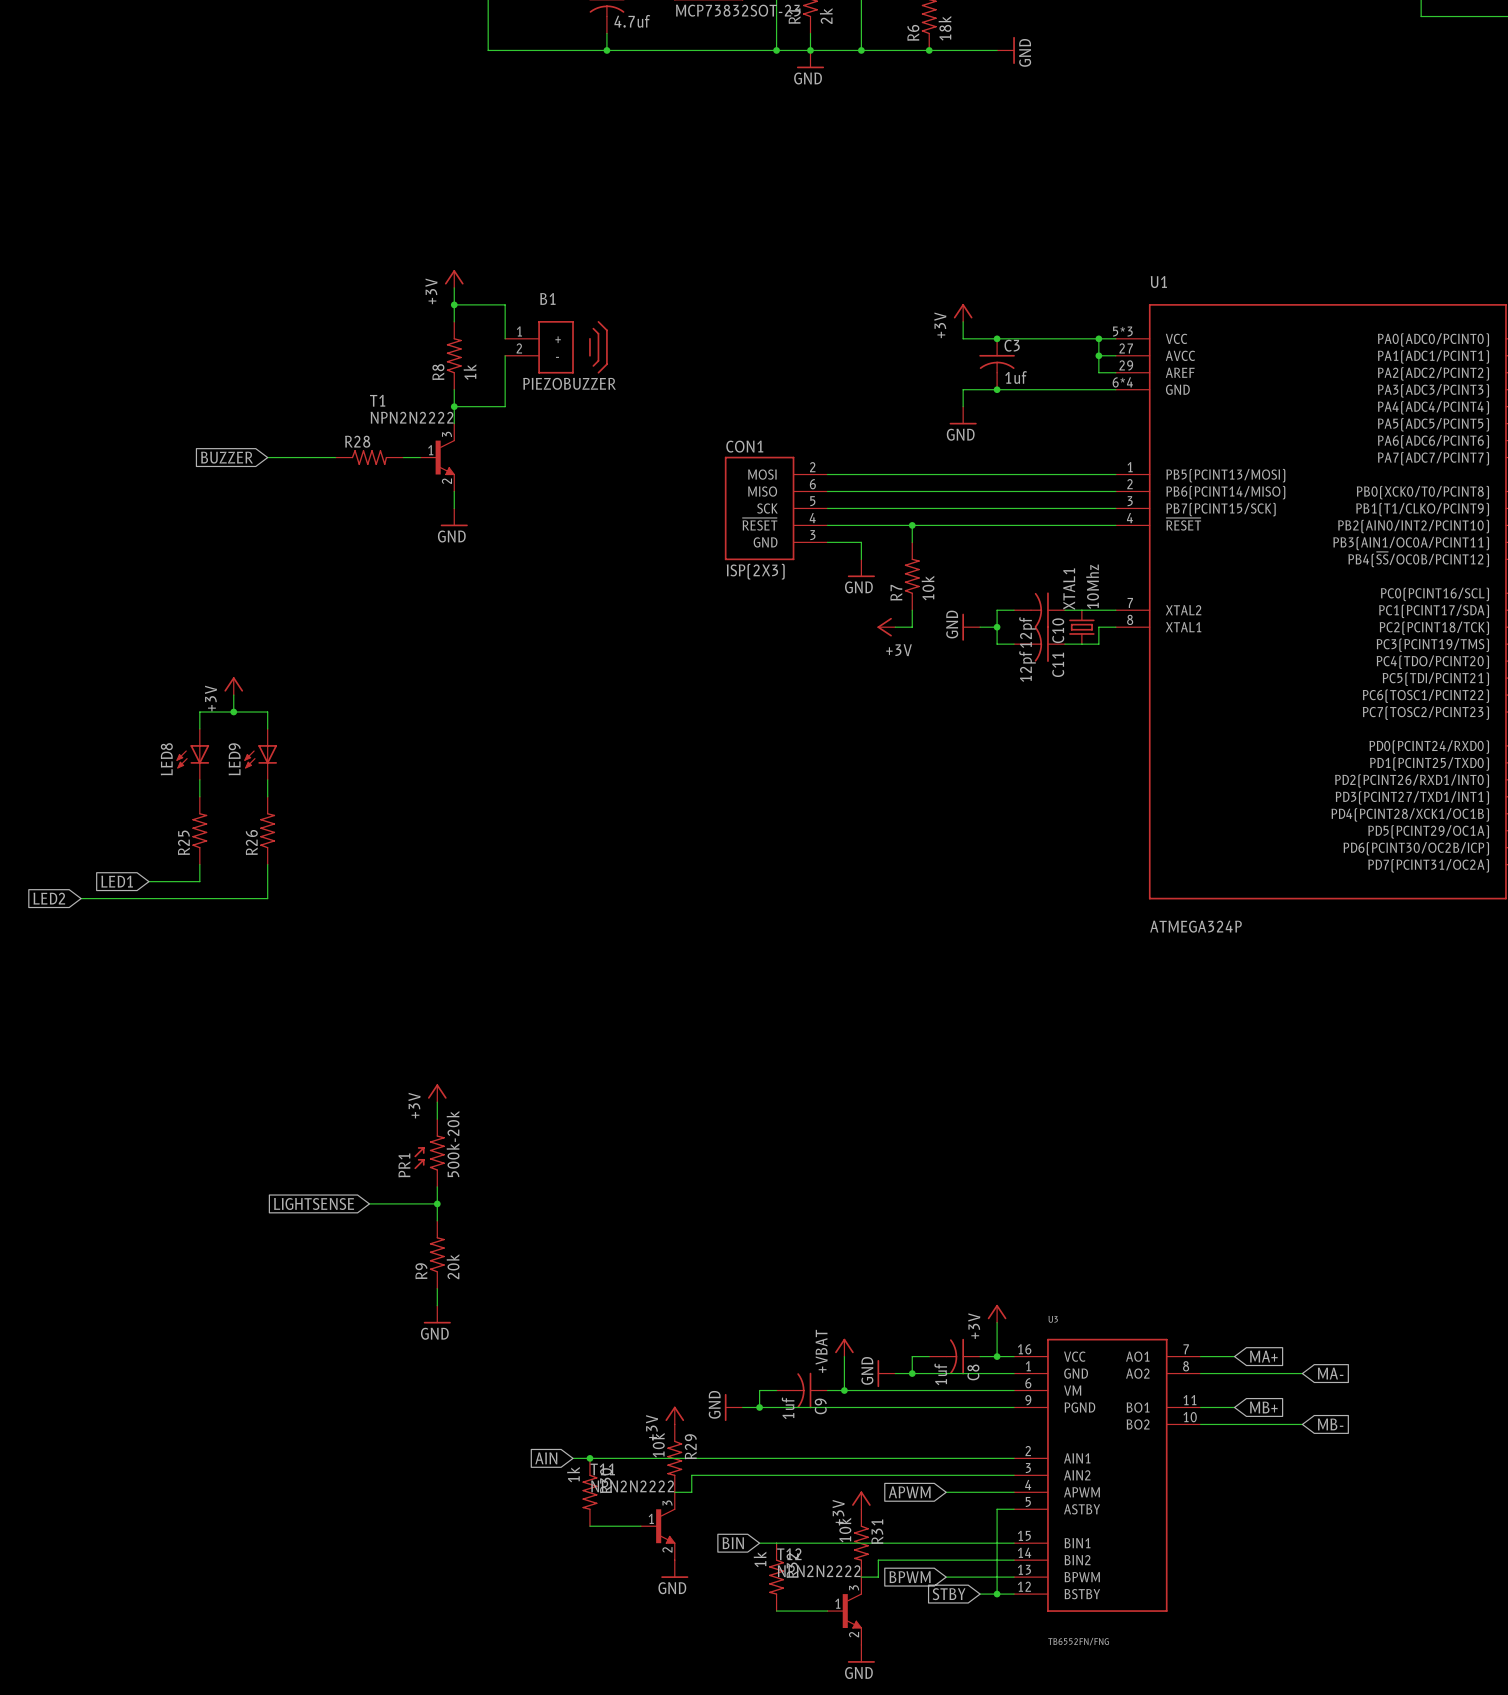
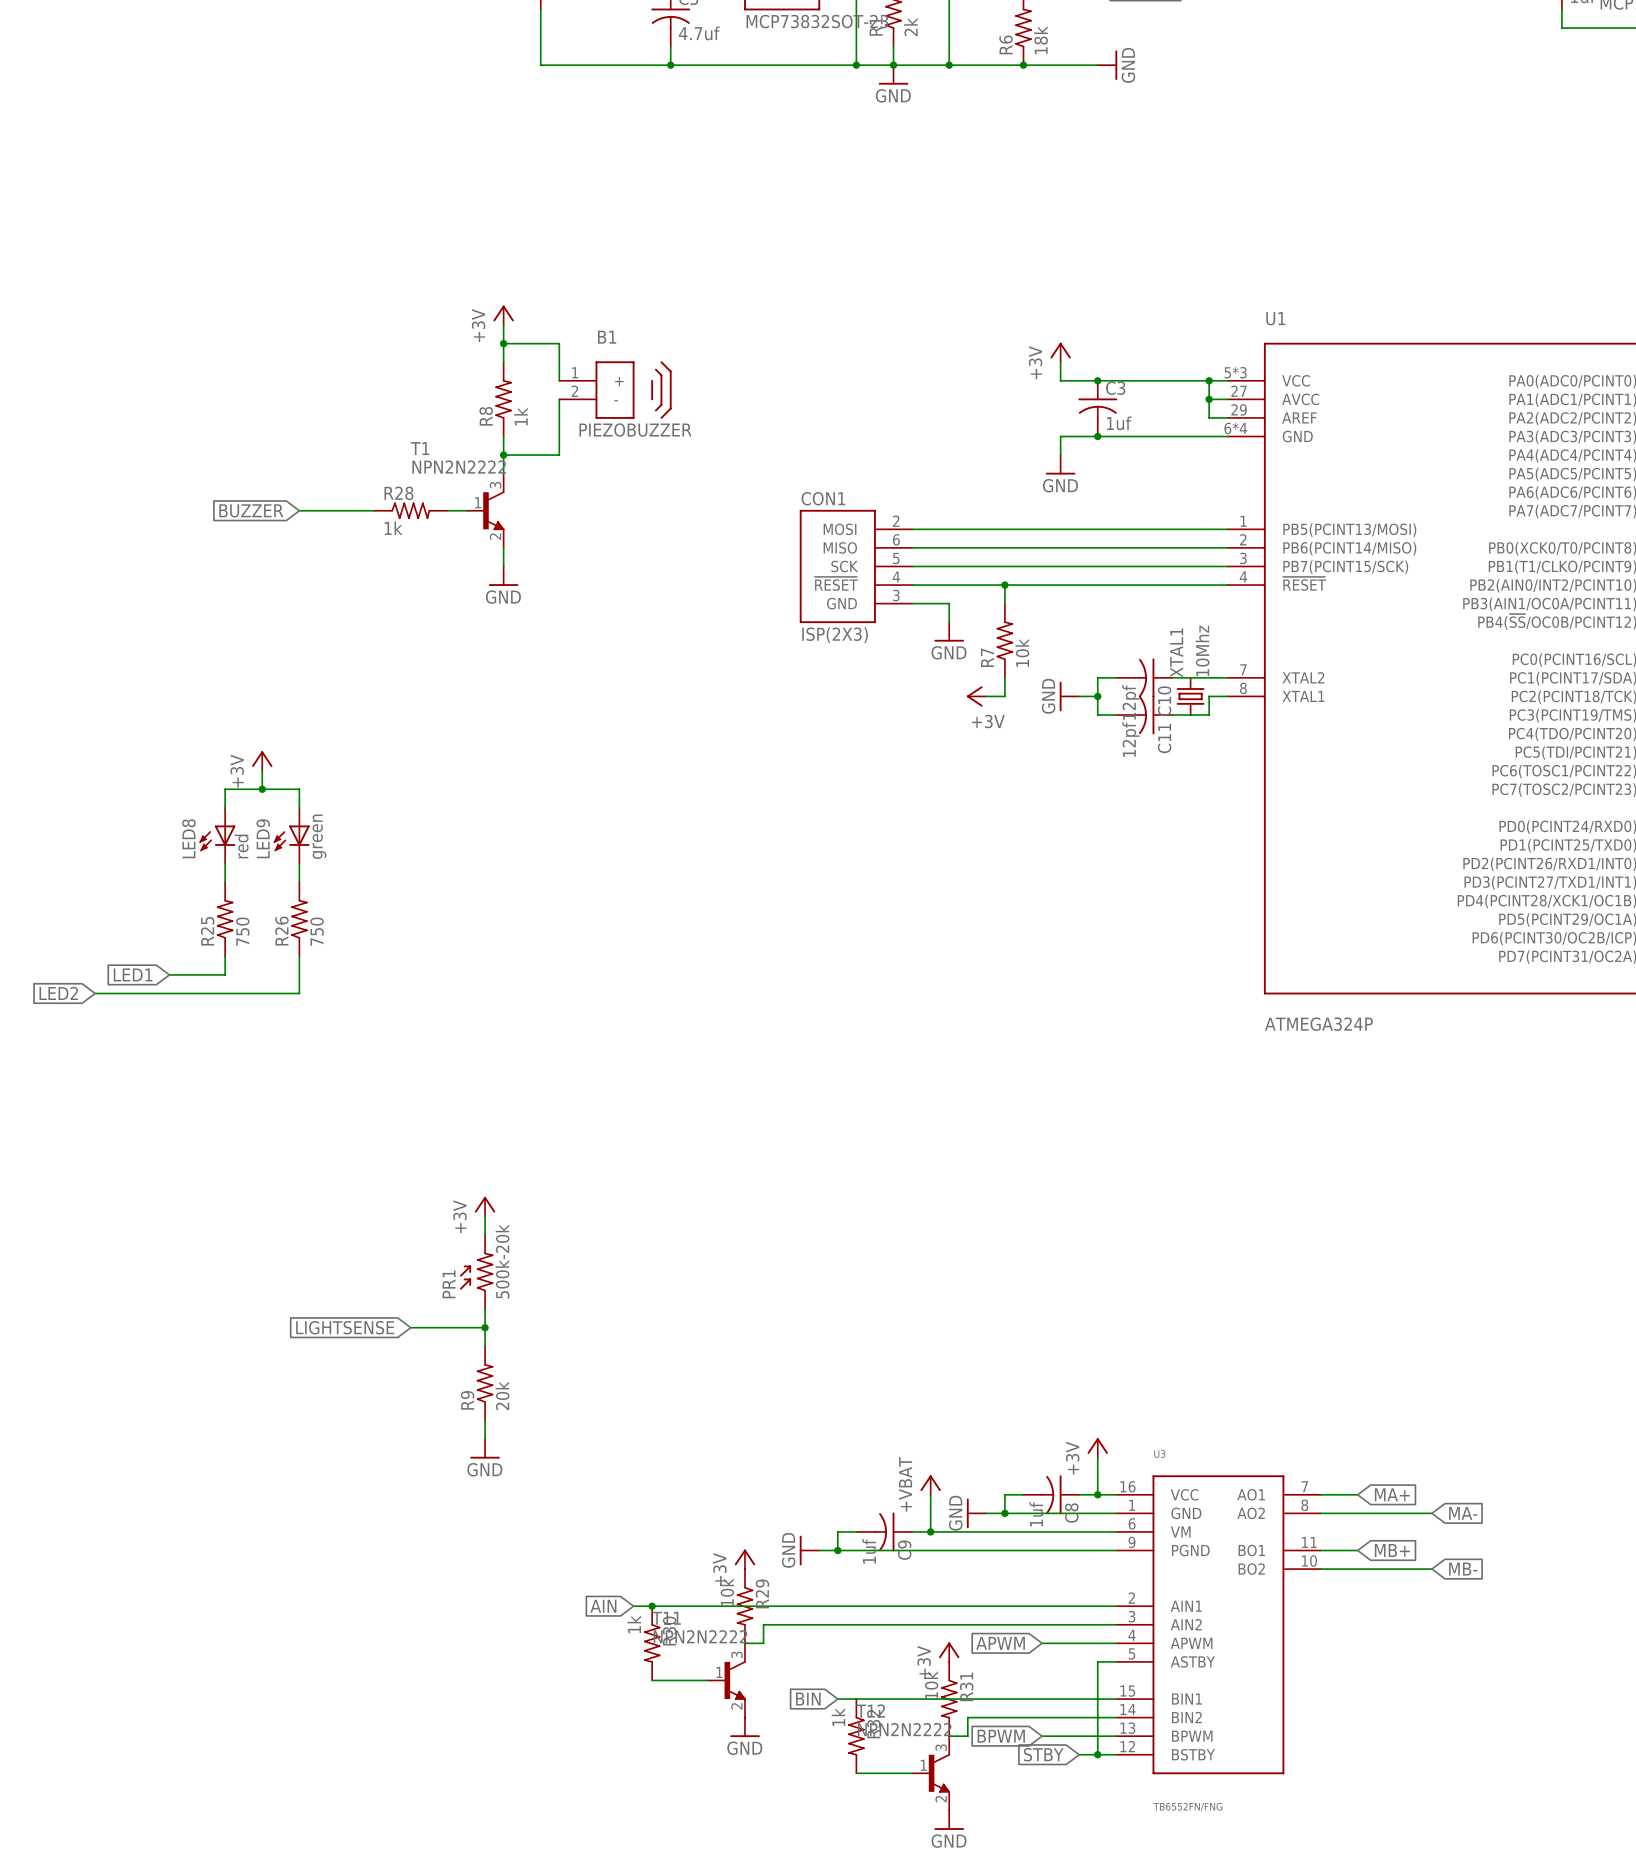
R28 value: none -> 1k (393, 528)
LED9 value: none -> green (319, 836)
LED8 value: none -> red (241, 846)
R25 value: none -> 750 (242, 931)
R26 value: none -> 750 (317, 931)

